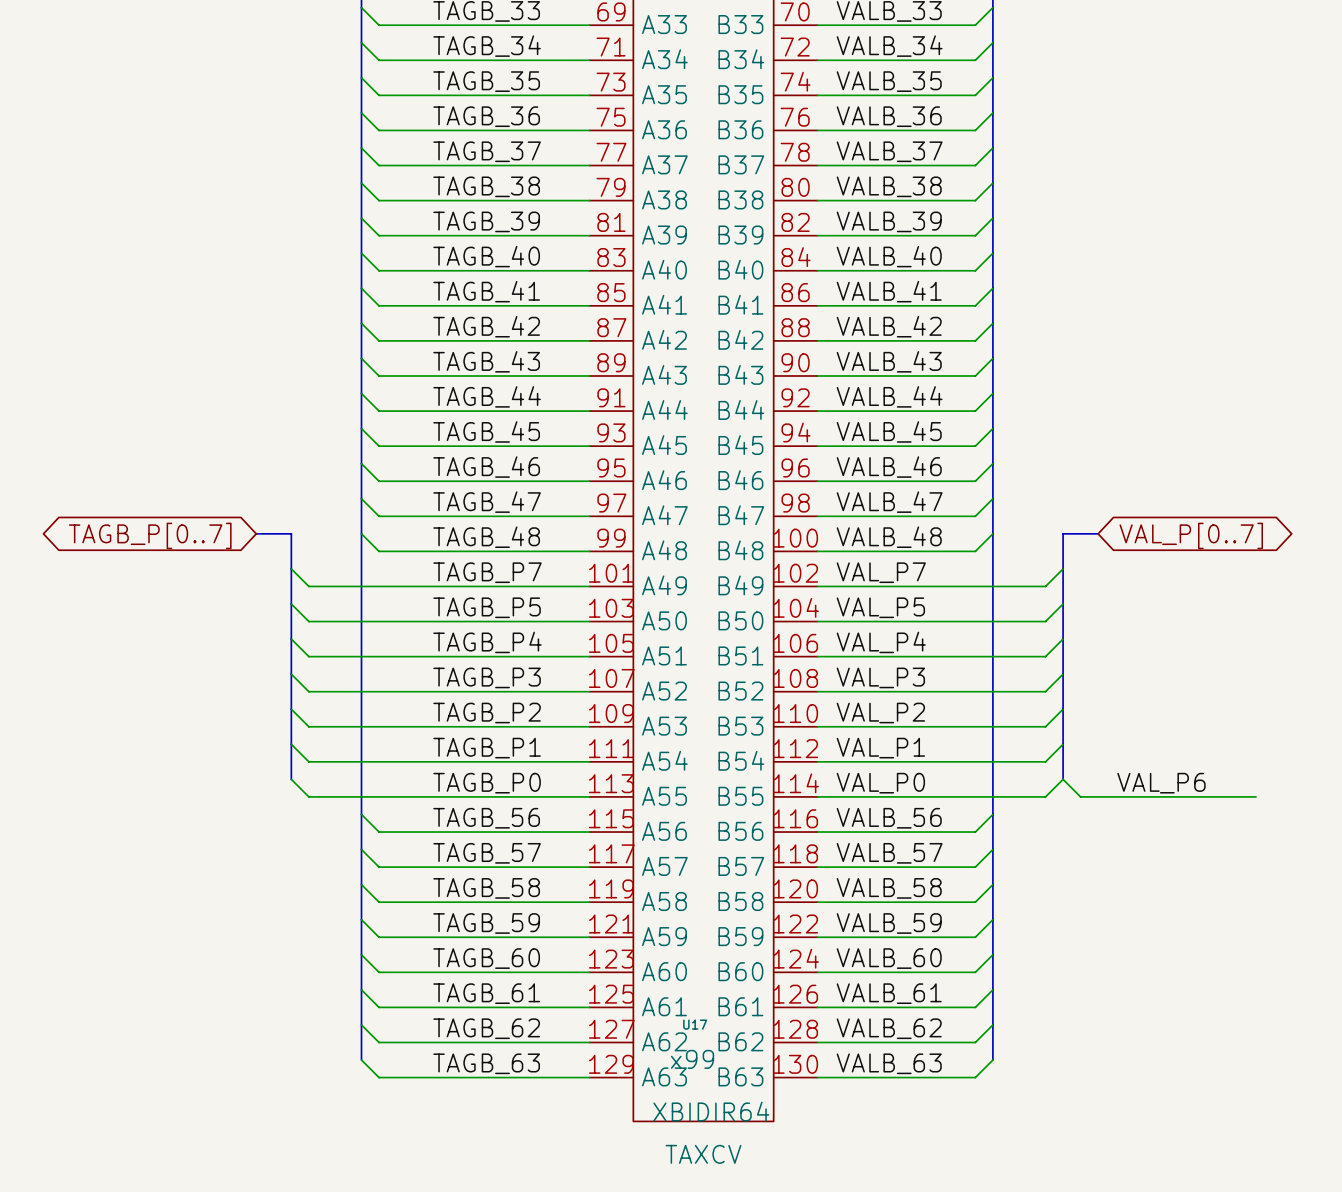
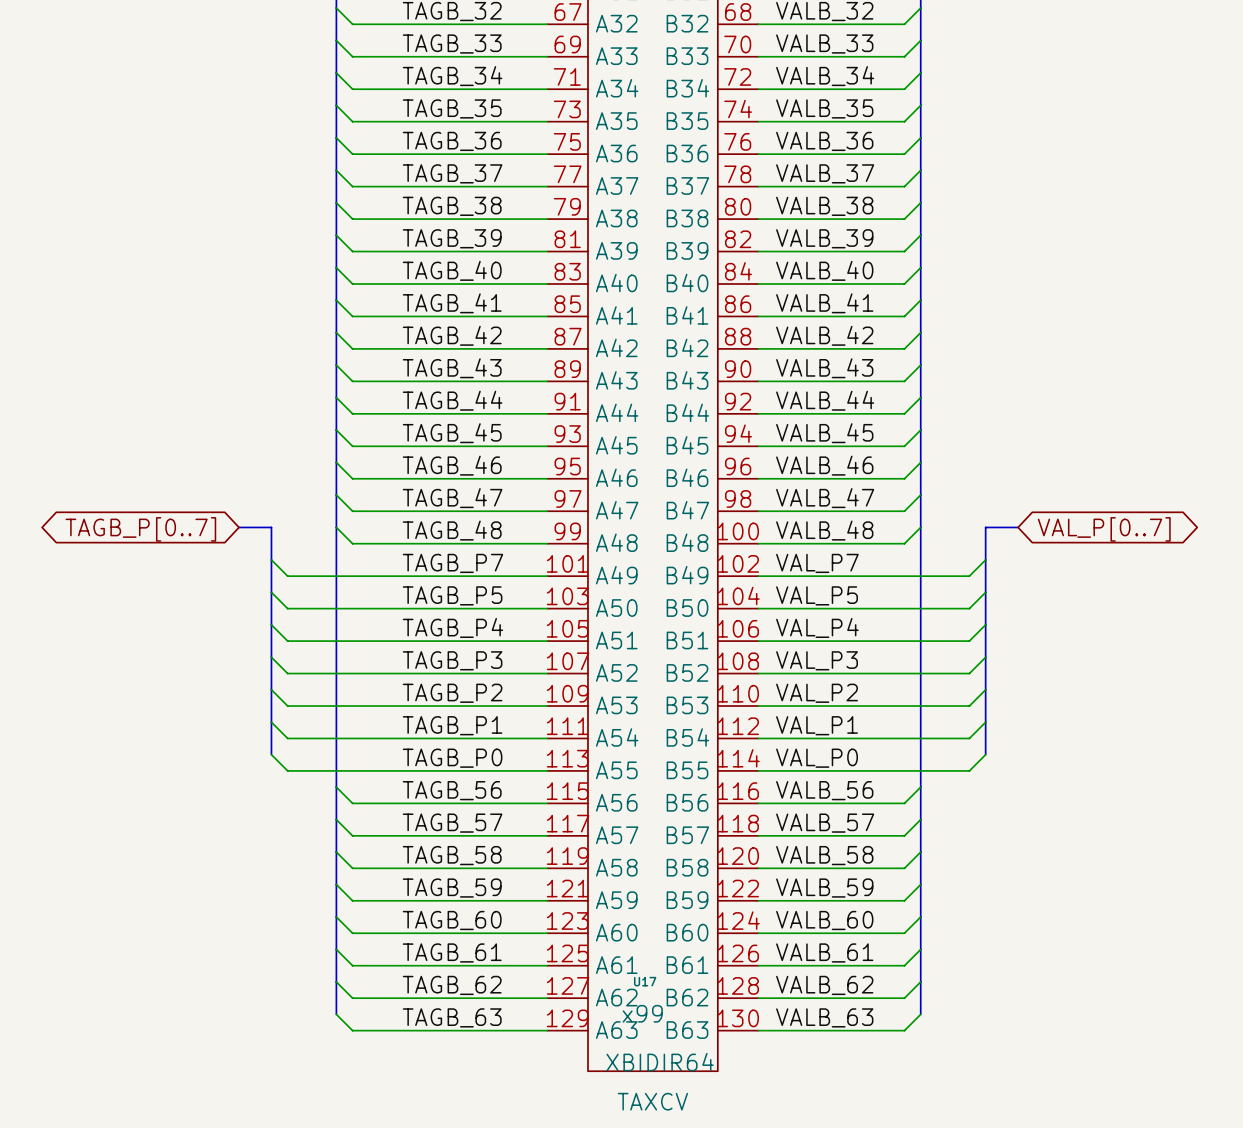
wire: (1063, 779) (1080, 796) (1256, 796) -> none
label: VAL_P6 (1161, 783) -> none

